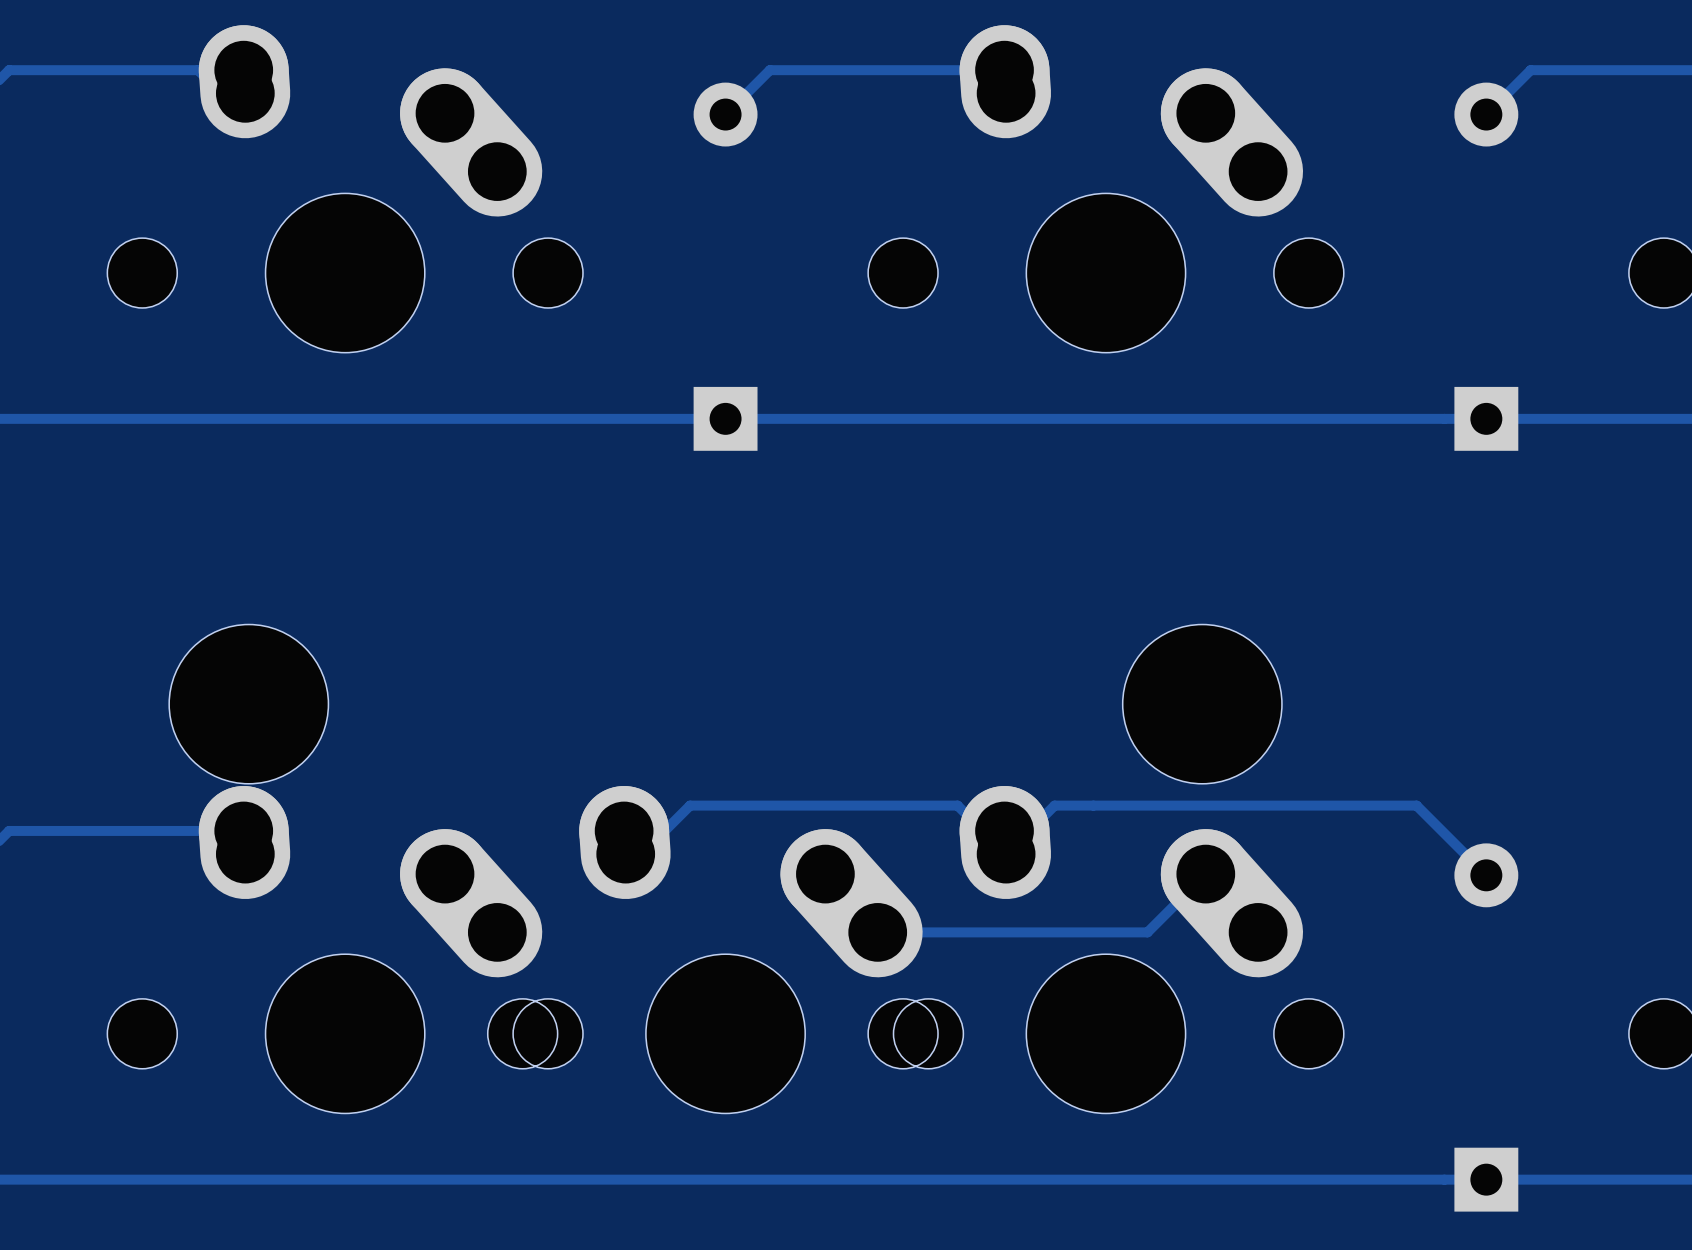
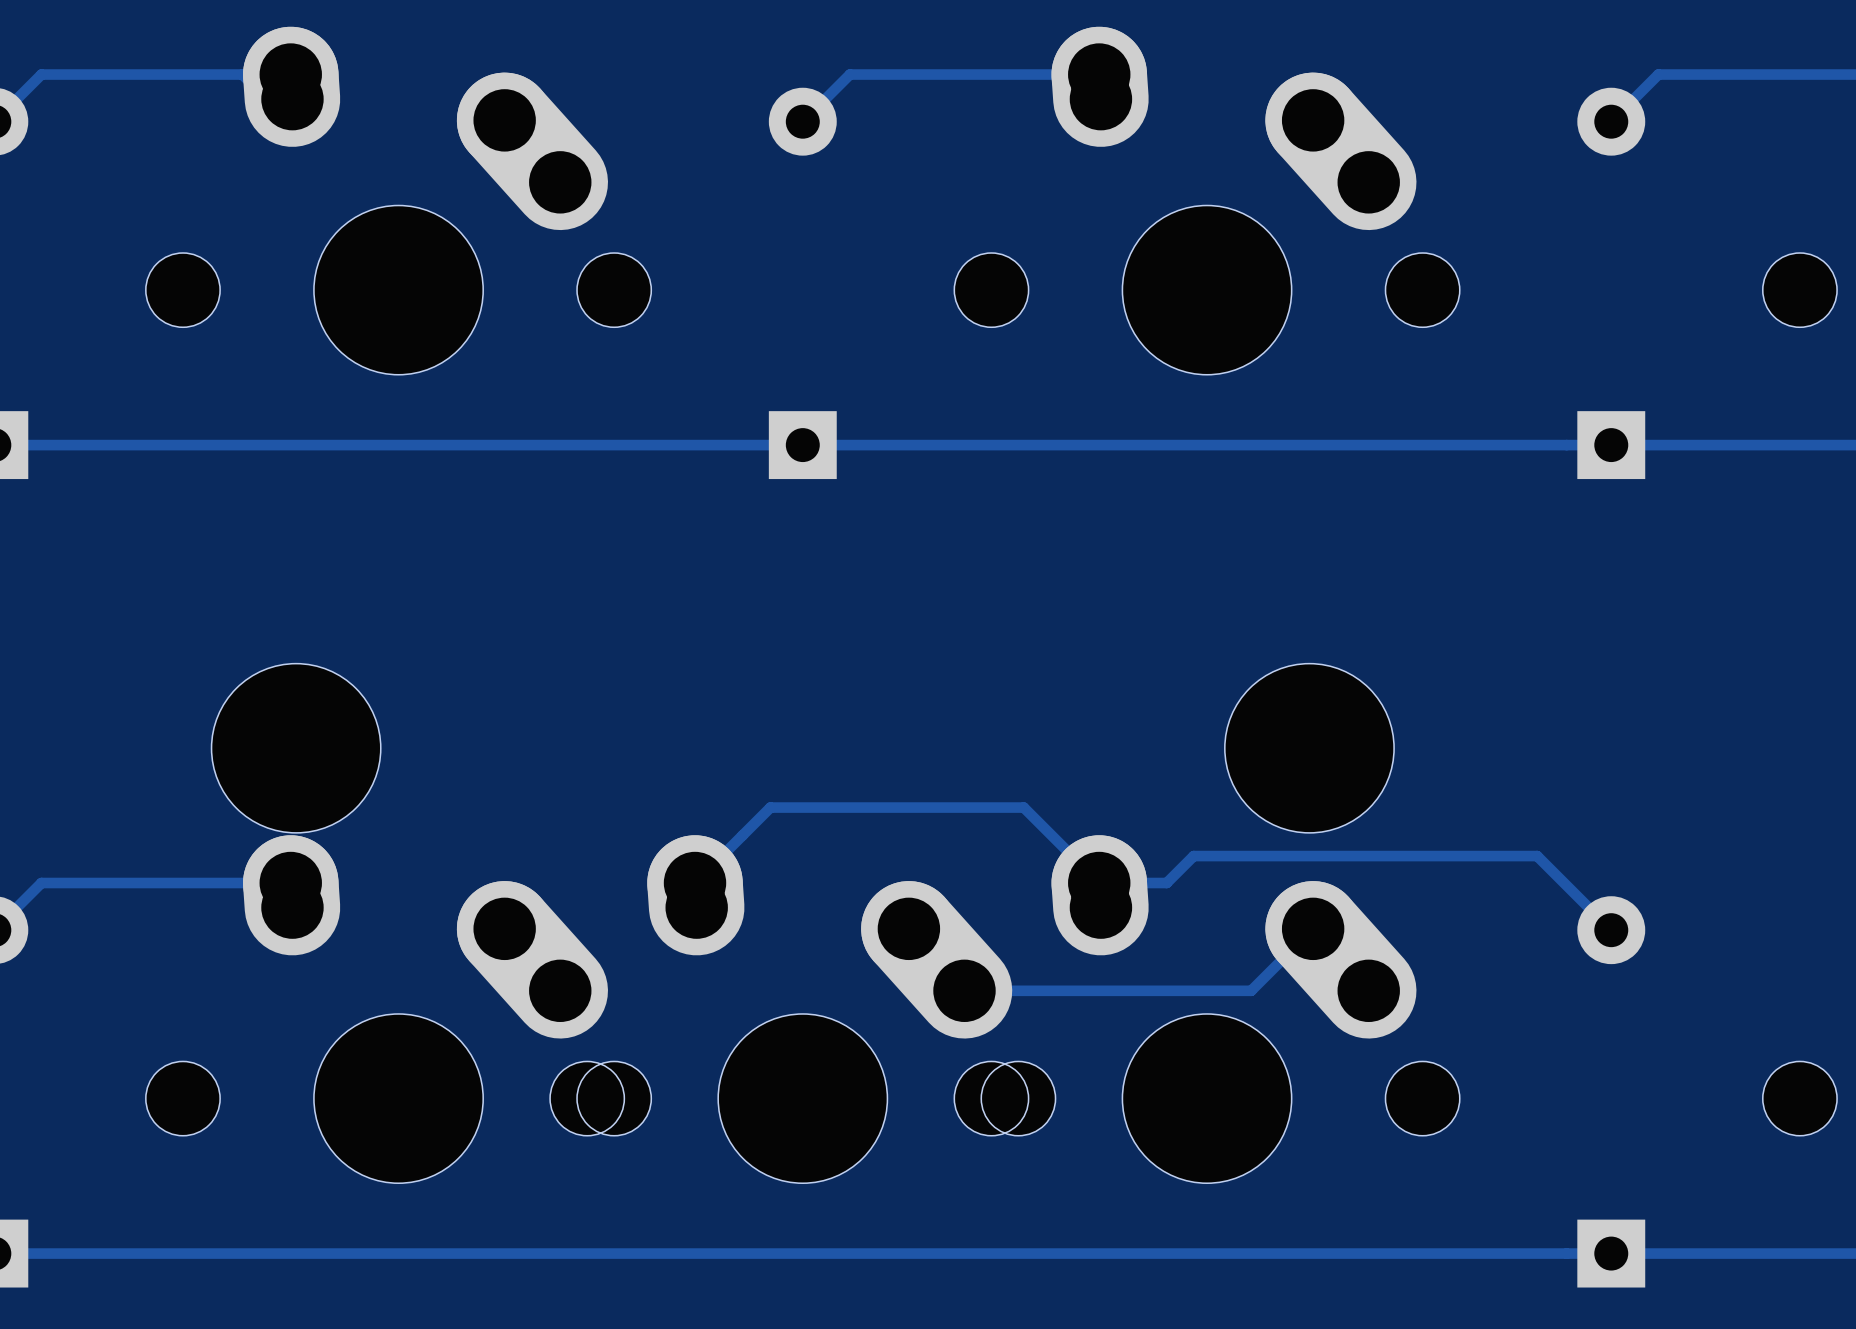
track: (1093, 805) (1054, 805) (1006, 854) (957, 805) (690, 805) (641, 854) (625, 854) -> (1193, 856) (1166, 883) (1099, 883) (1023, 807) (770, 807) (695, 883)

